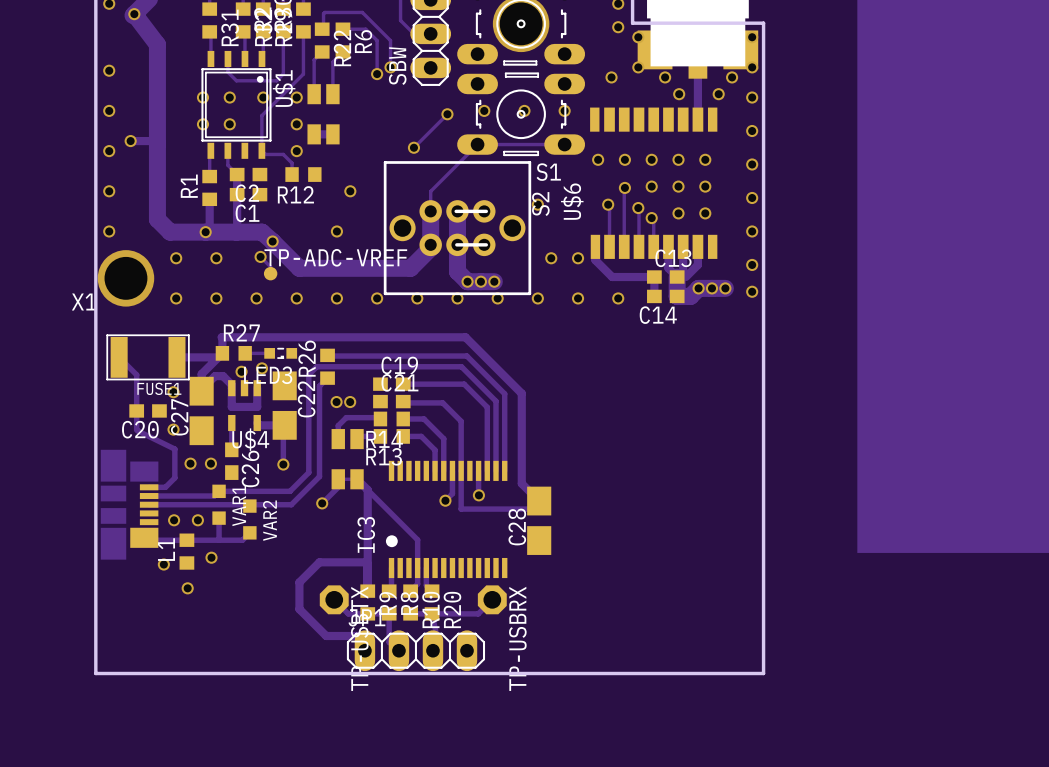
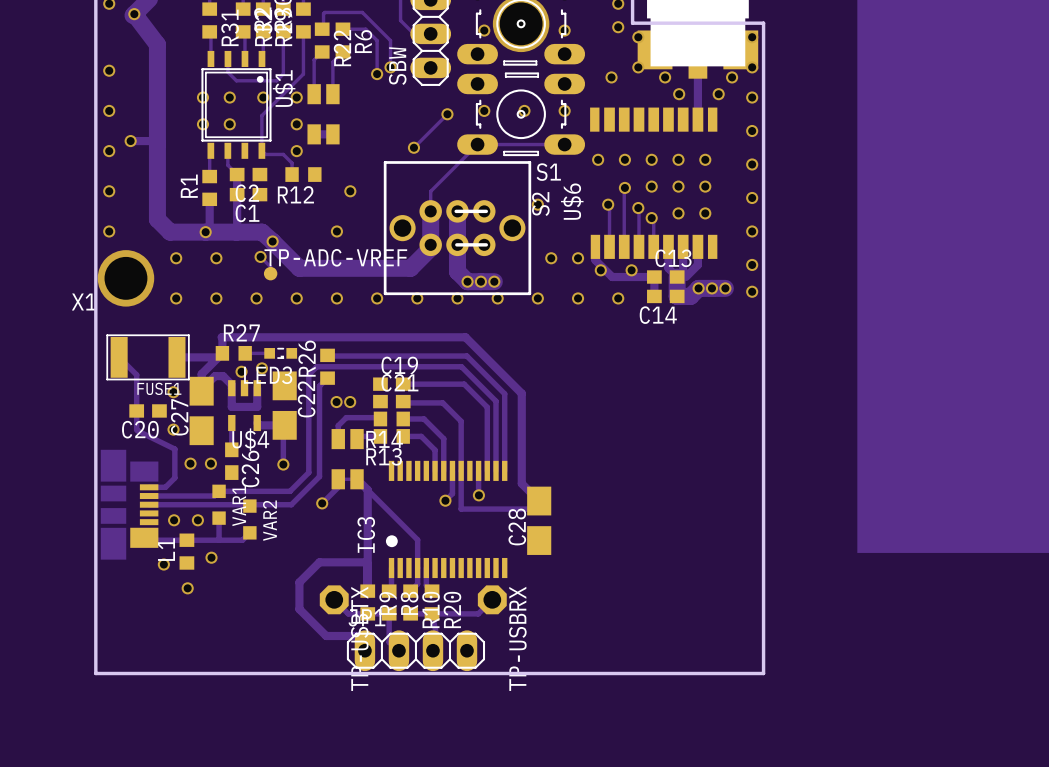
via: none -> (484, 30)
via: none -> (564, 30)
via: none -> (600, 270)
via: none -> (631, 270)

